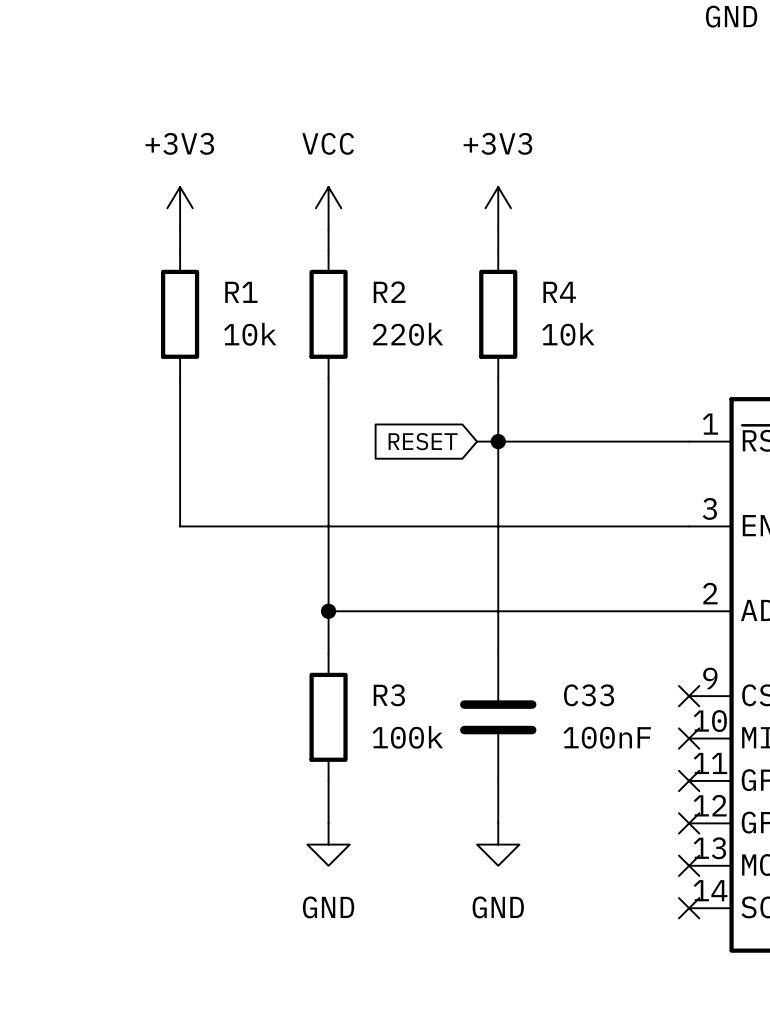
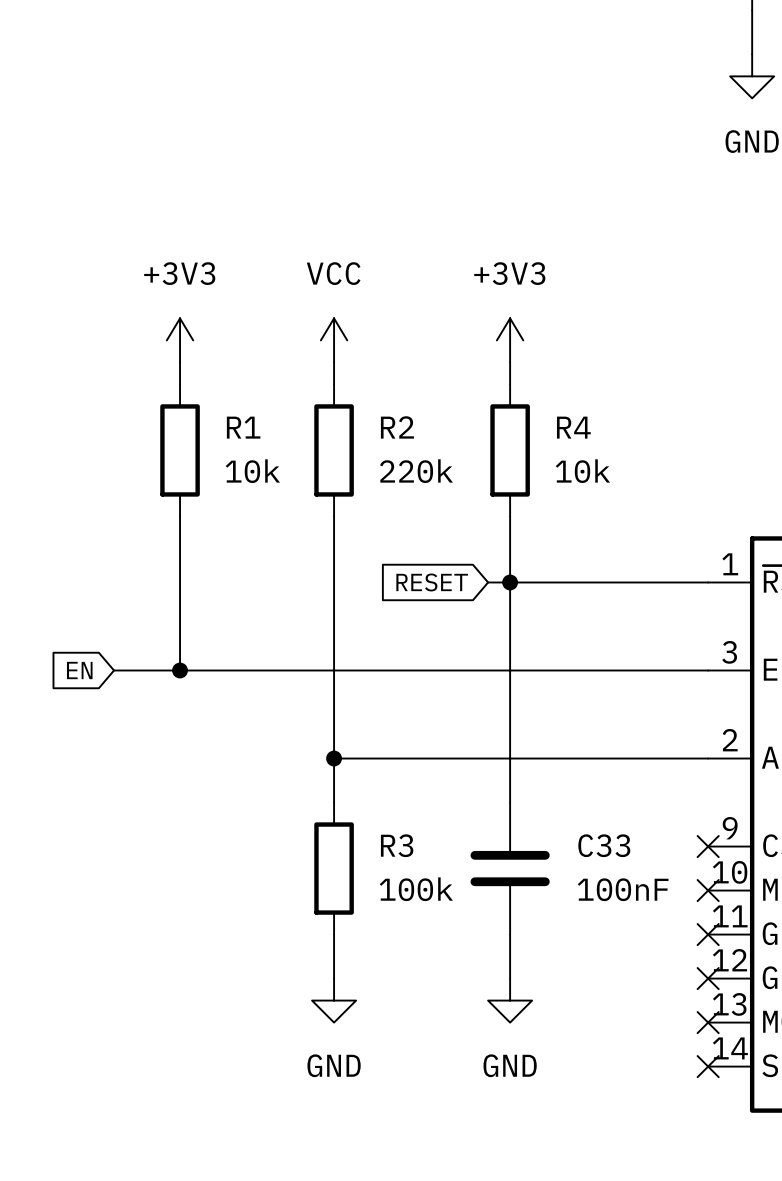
global label: none -> EN (79, 670)
wire: none -> (114, 670) (180, 670)
junction: none -> (180, 670)

